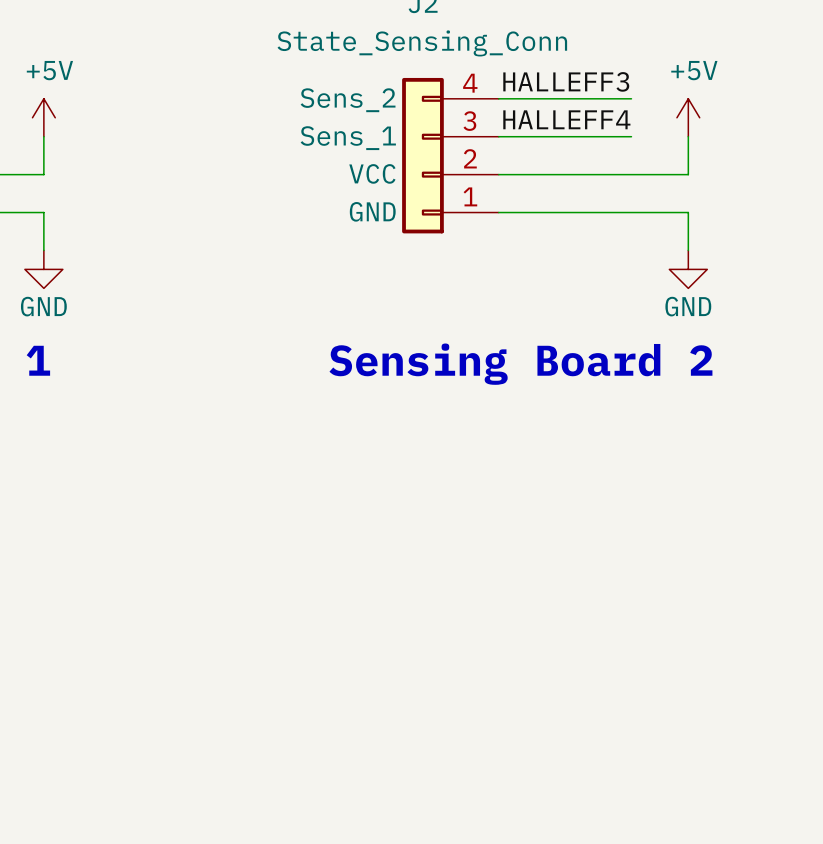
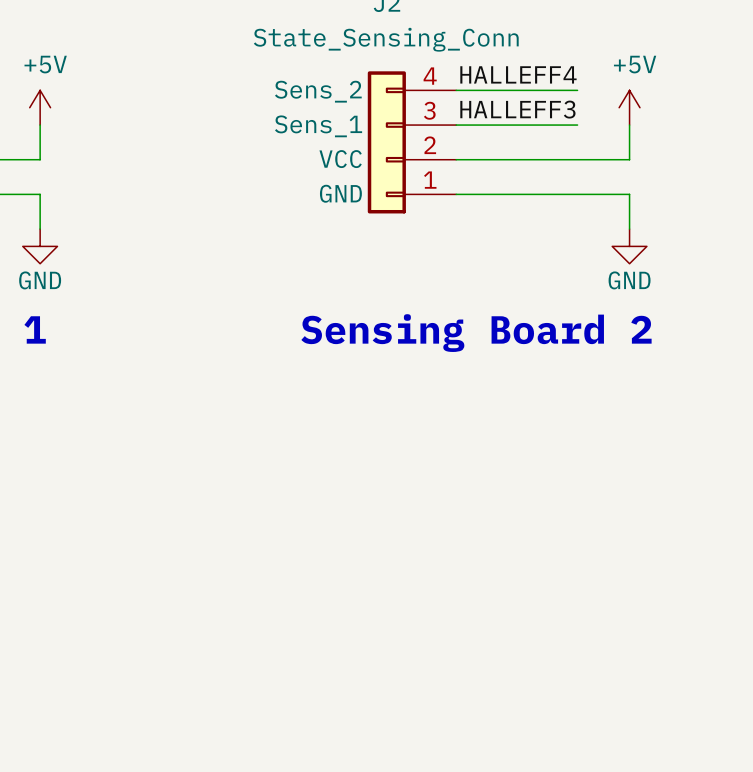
label: HALLEFF3 (566, 81) -> HALLEFF4 (518, 74)
label: HALLEFF4 (566, 119) -> HALLEFF3 (517, 109)

